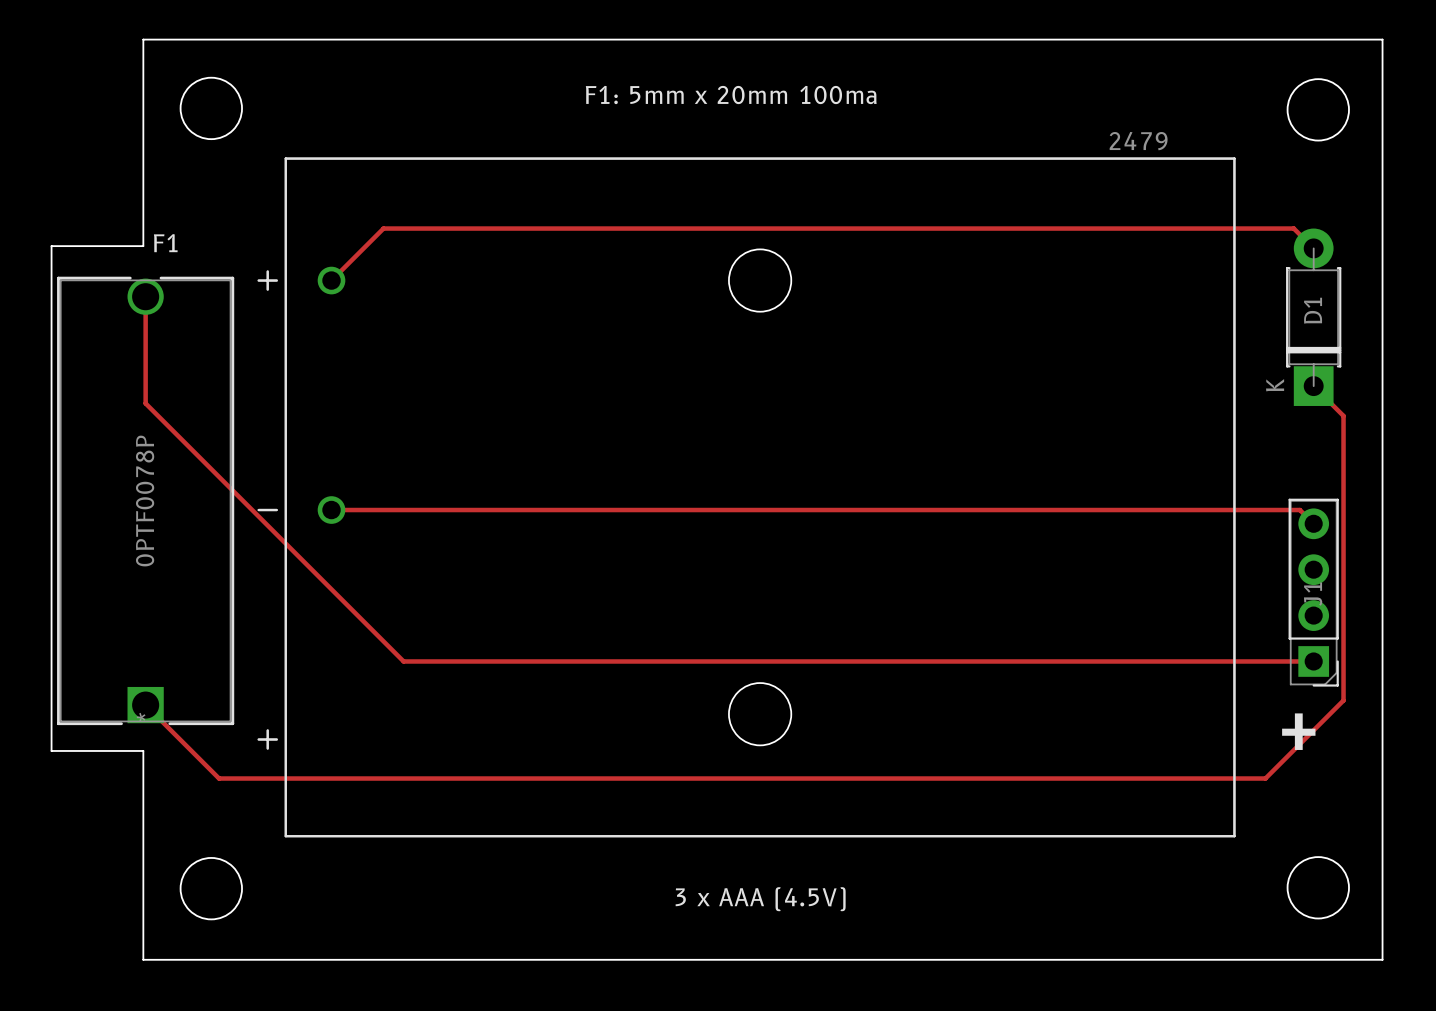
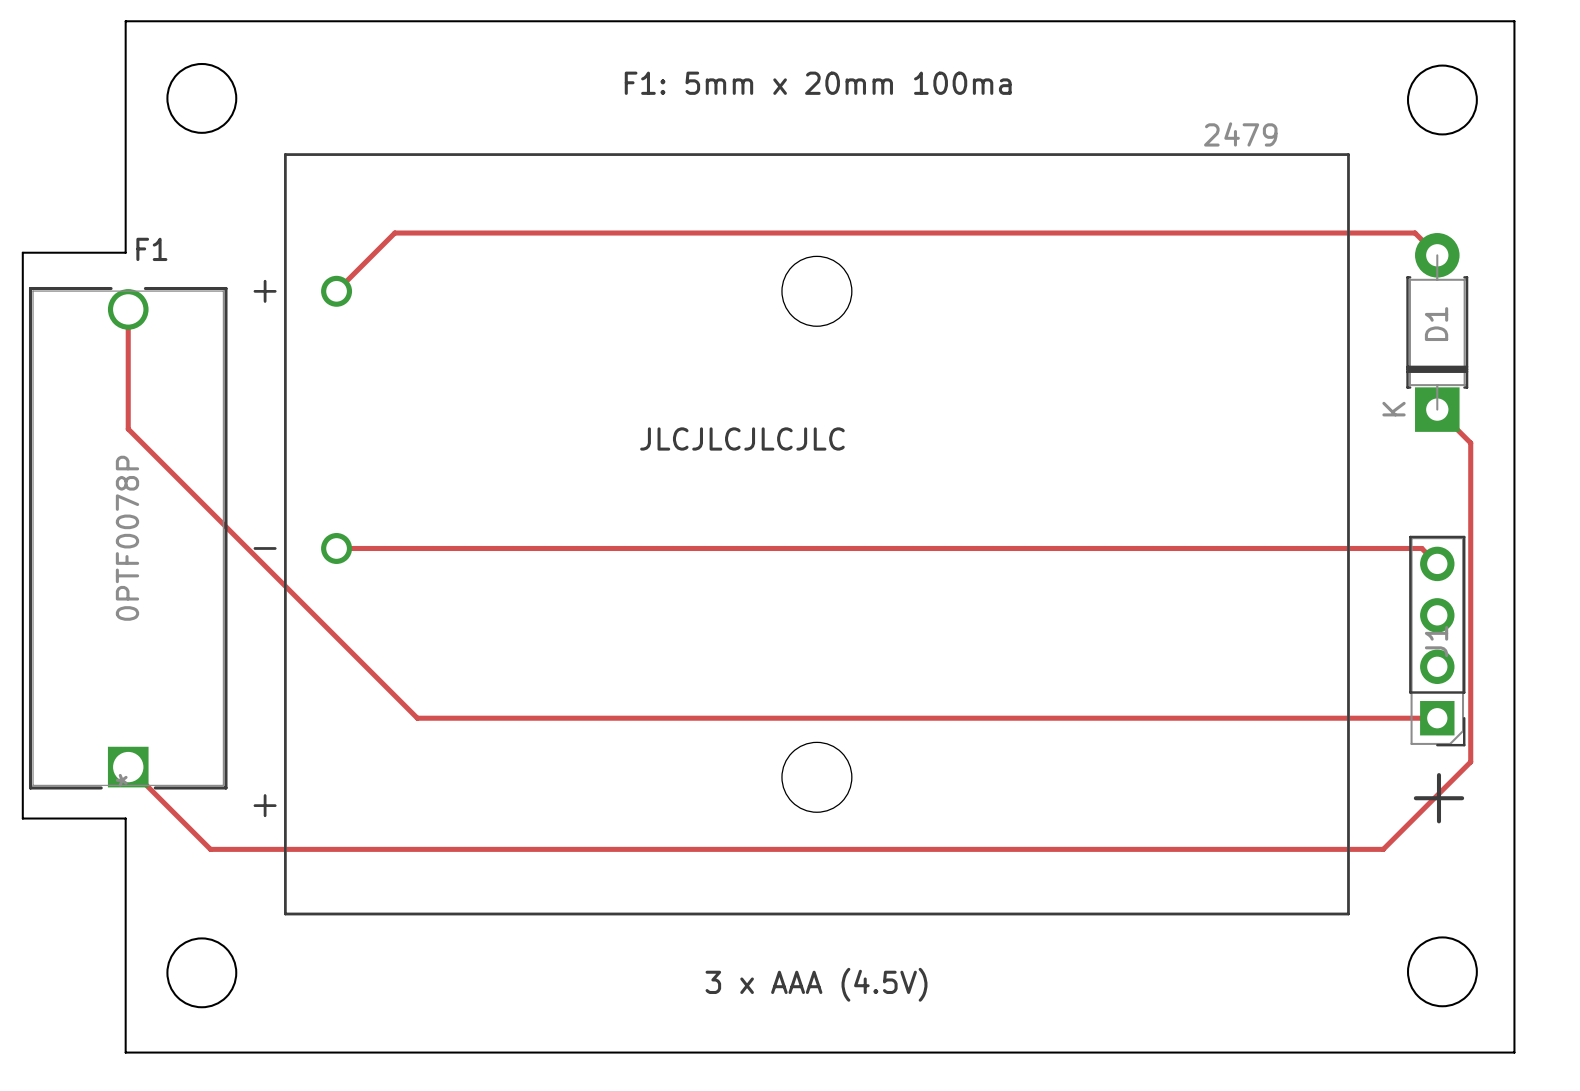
text: none -> JLCJLCJLCJLC (742, 438)

